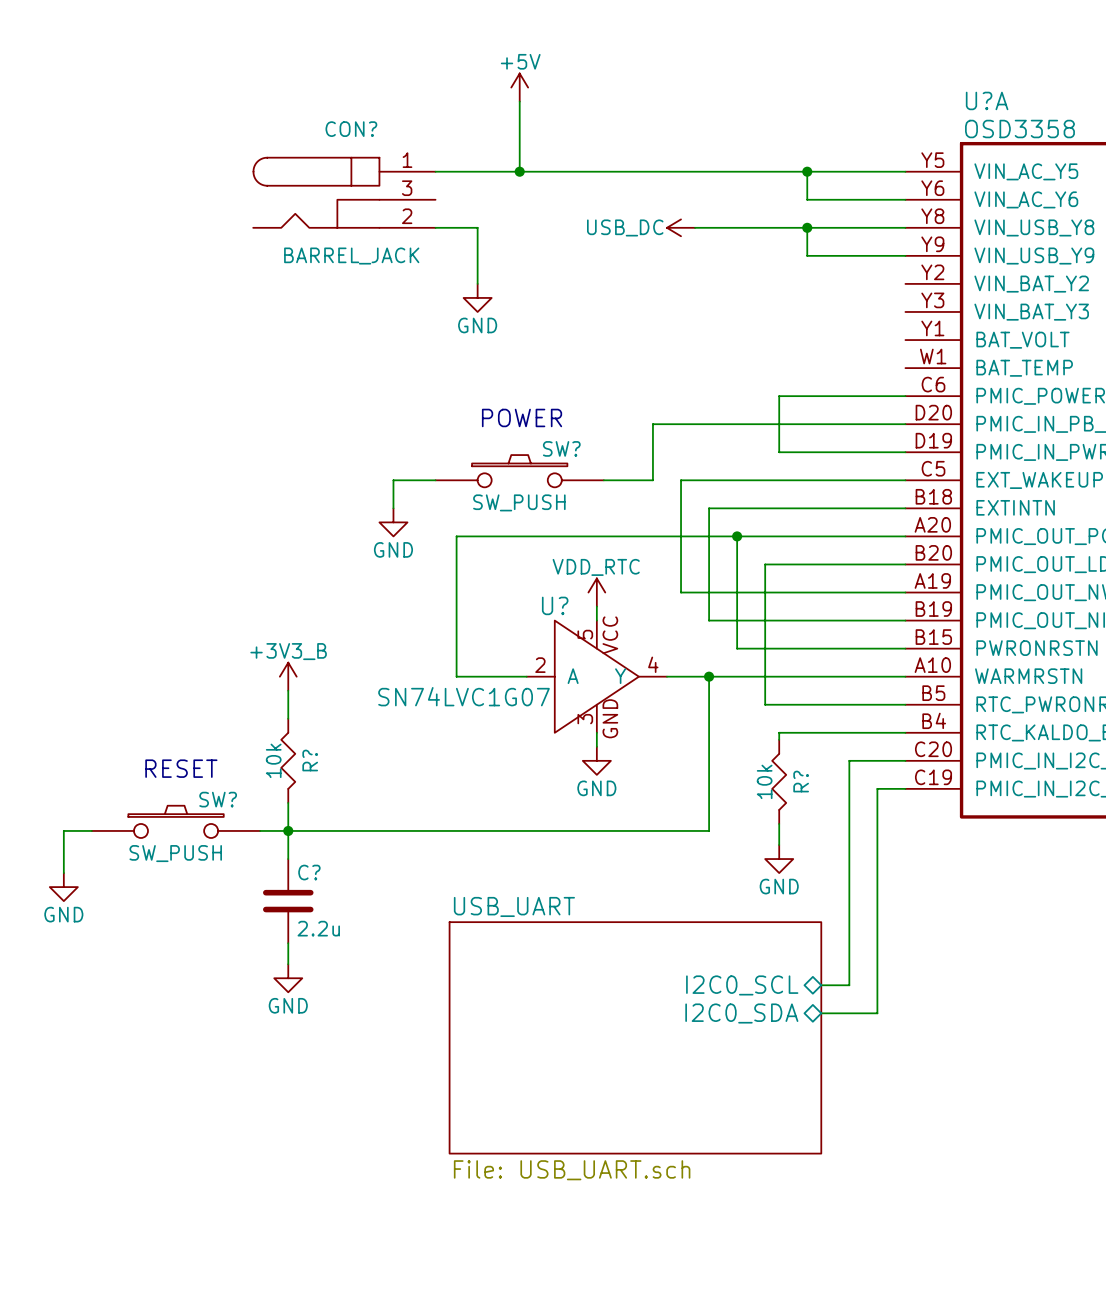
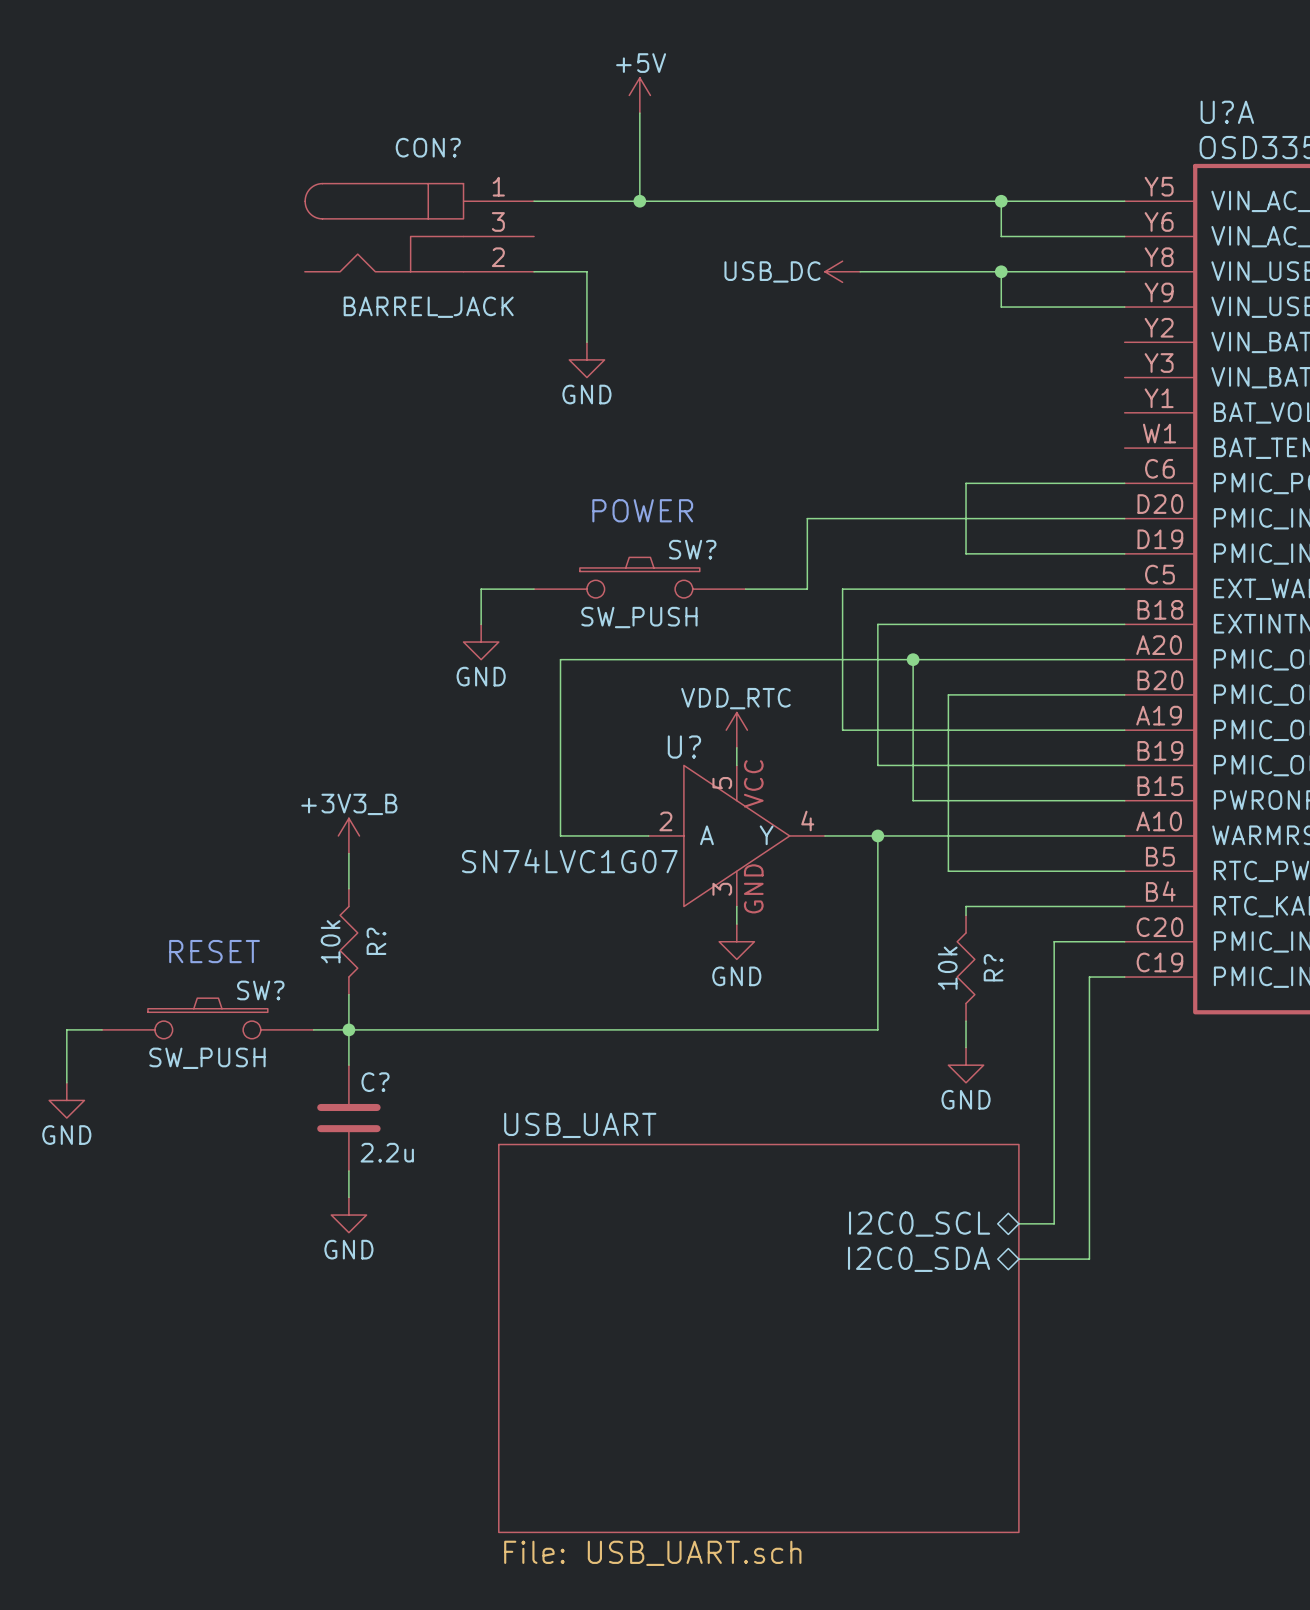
sheet USB_UART: File: USB_UART.sch (635, 1037) -> none
sheet USB_UART: none -> File: USB_UART.sch (758, 1338)

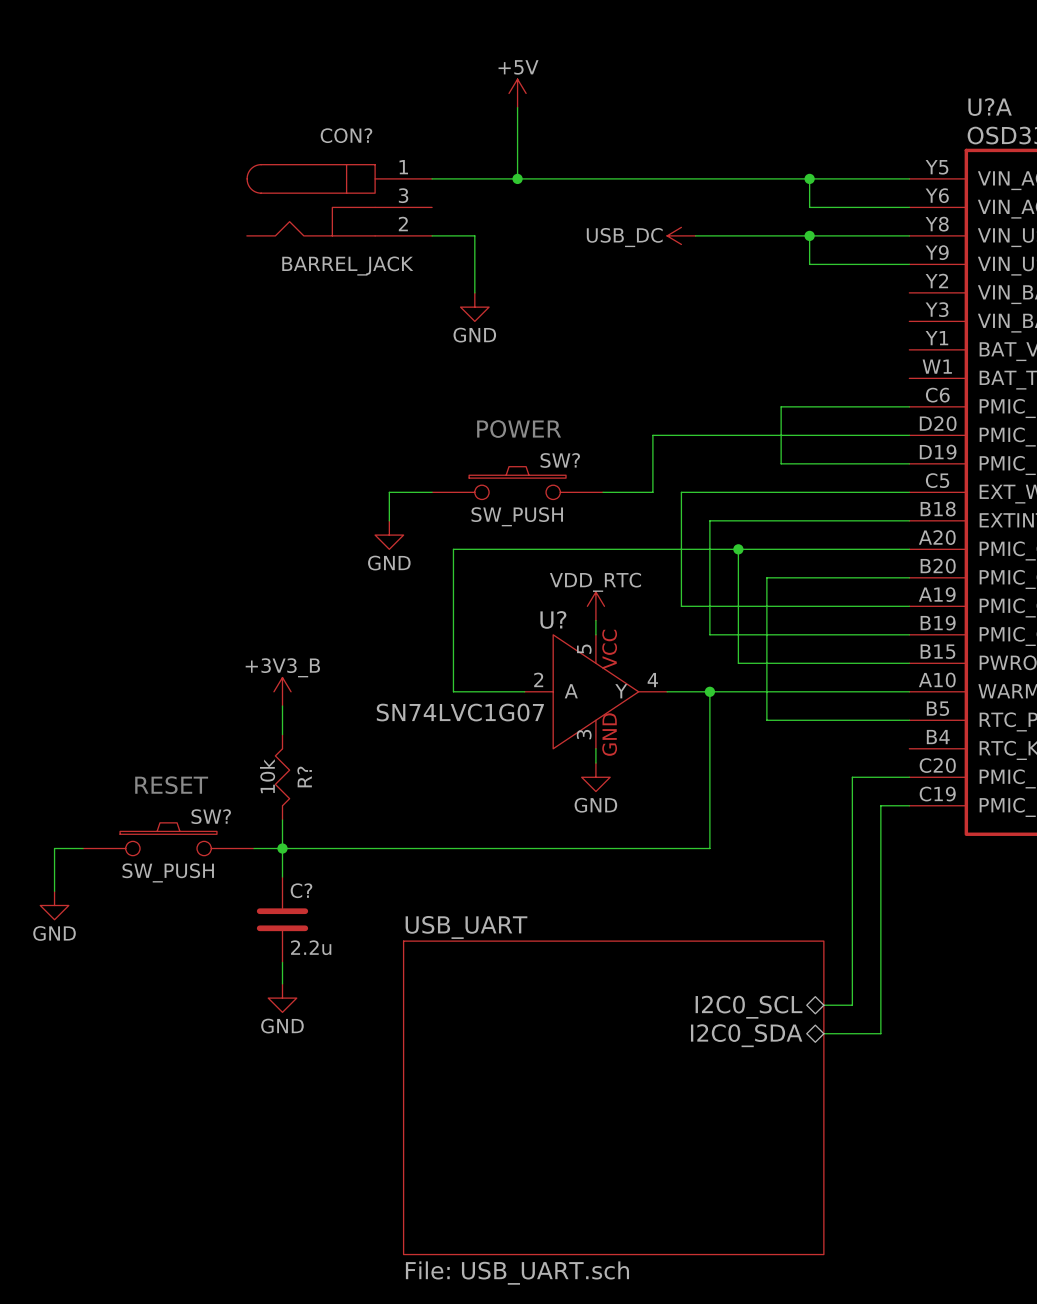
wire: (1124, 906) (966, 906) (966, 915) -> none
R?: 10k (966, 968) -> none
wire: (966, 1021) (966, 1047) -> none
power symbol: GND (966, 1065) -> none

